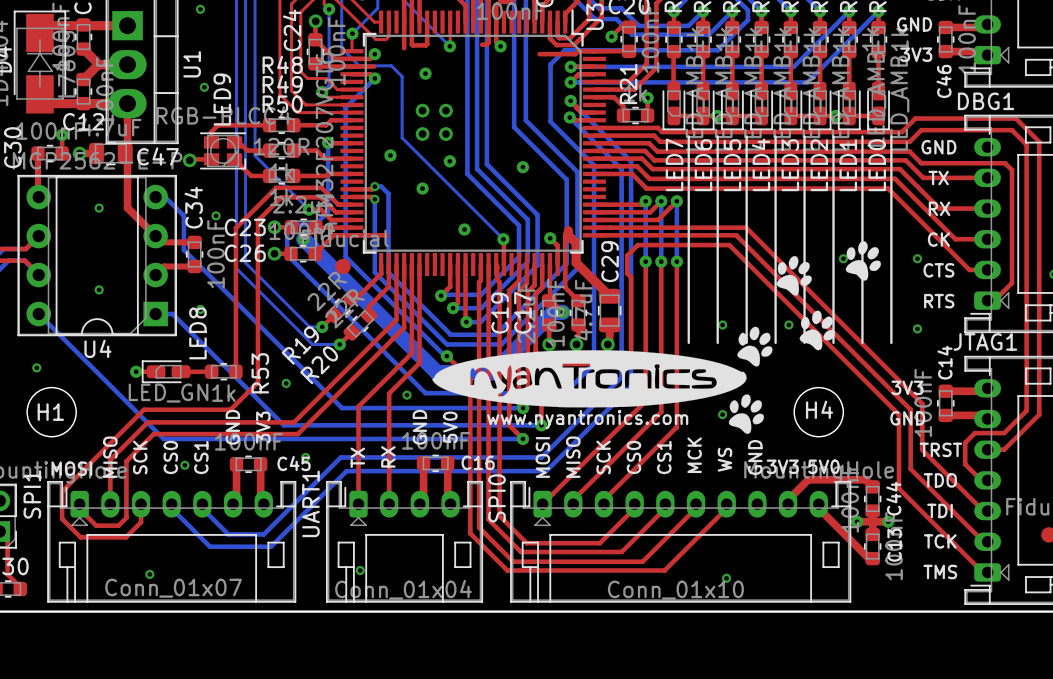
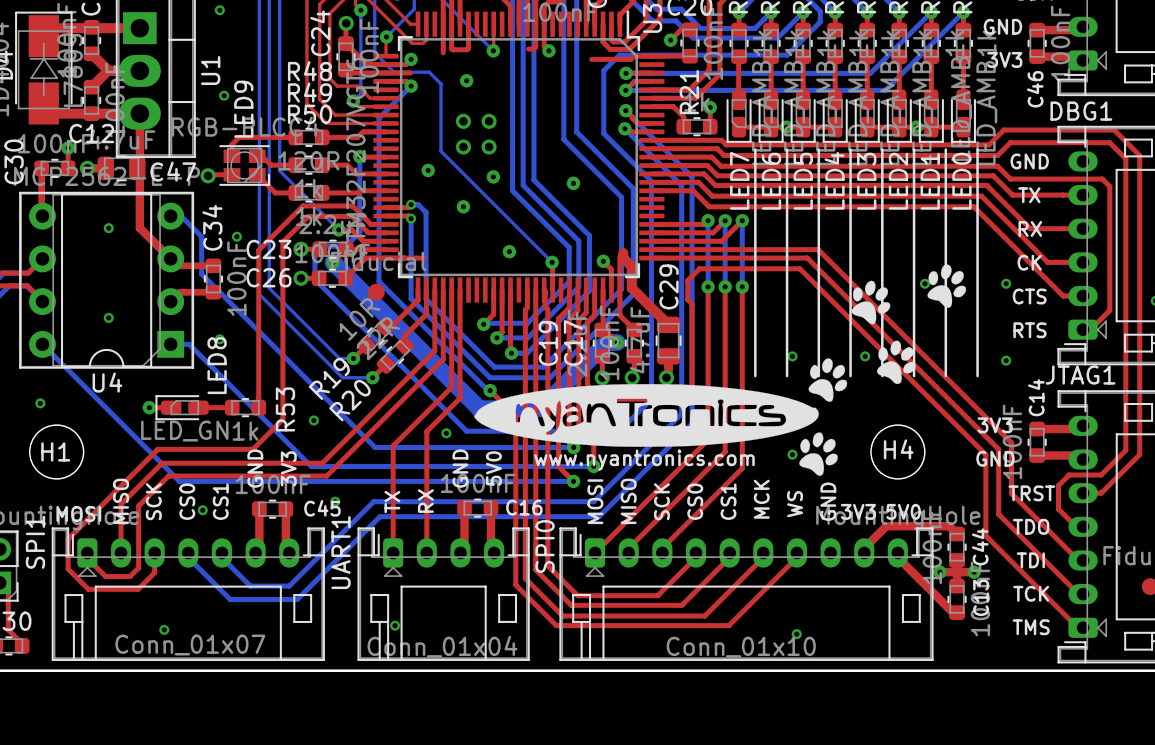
R20 value: 22R (327, 291) -> 10R (360, 319)

